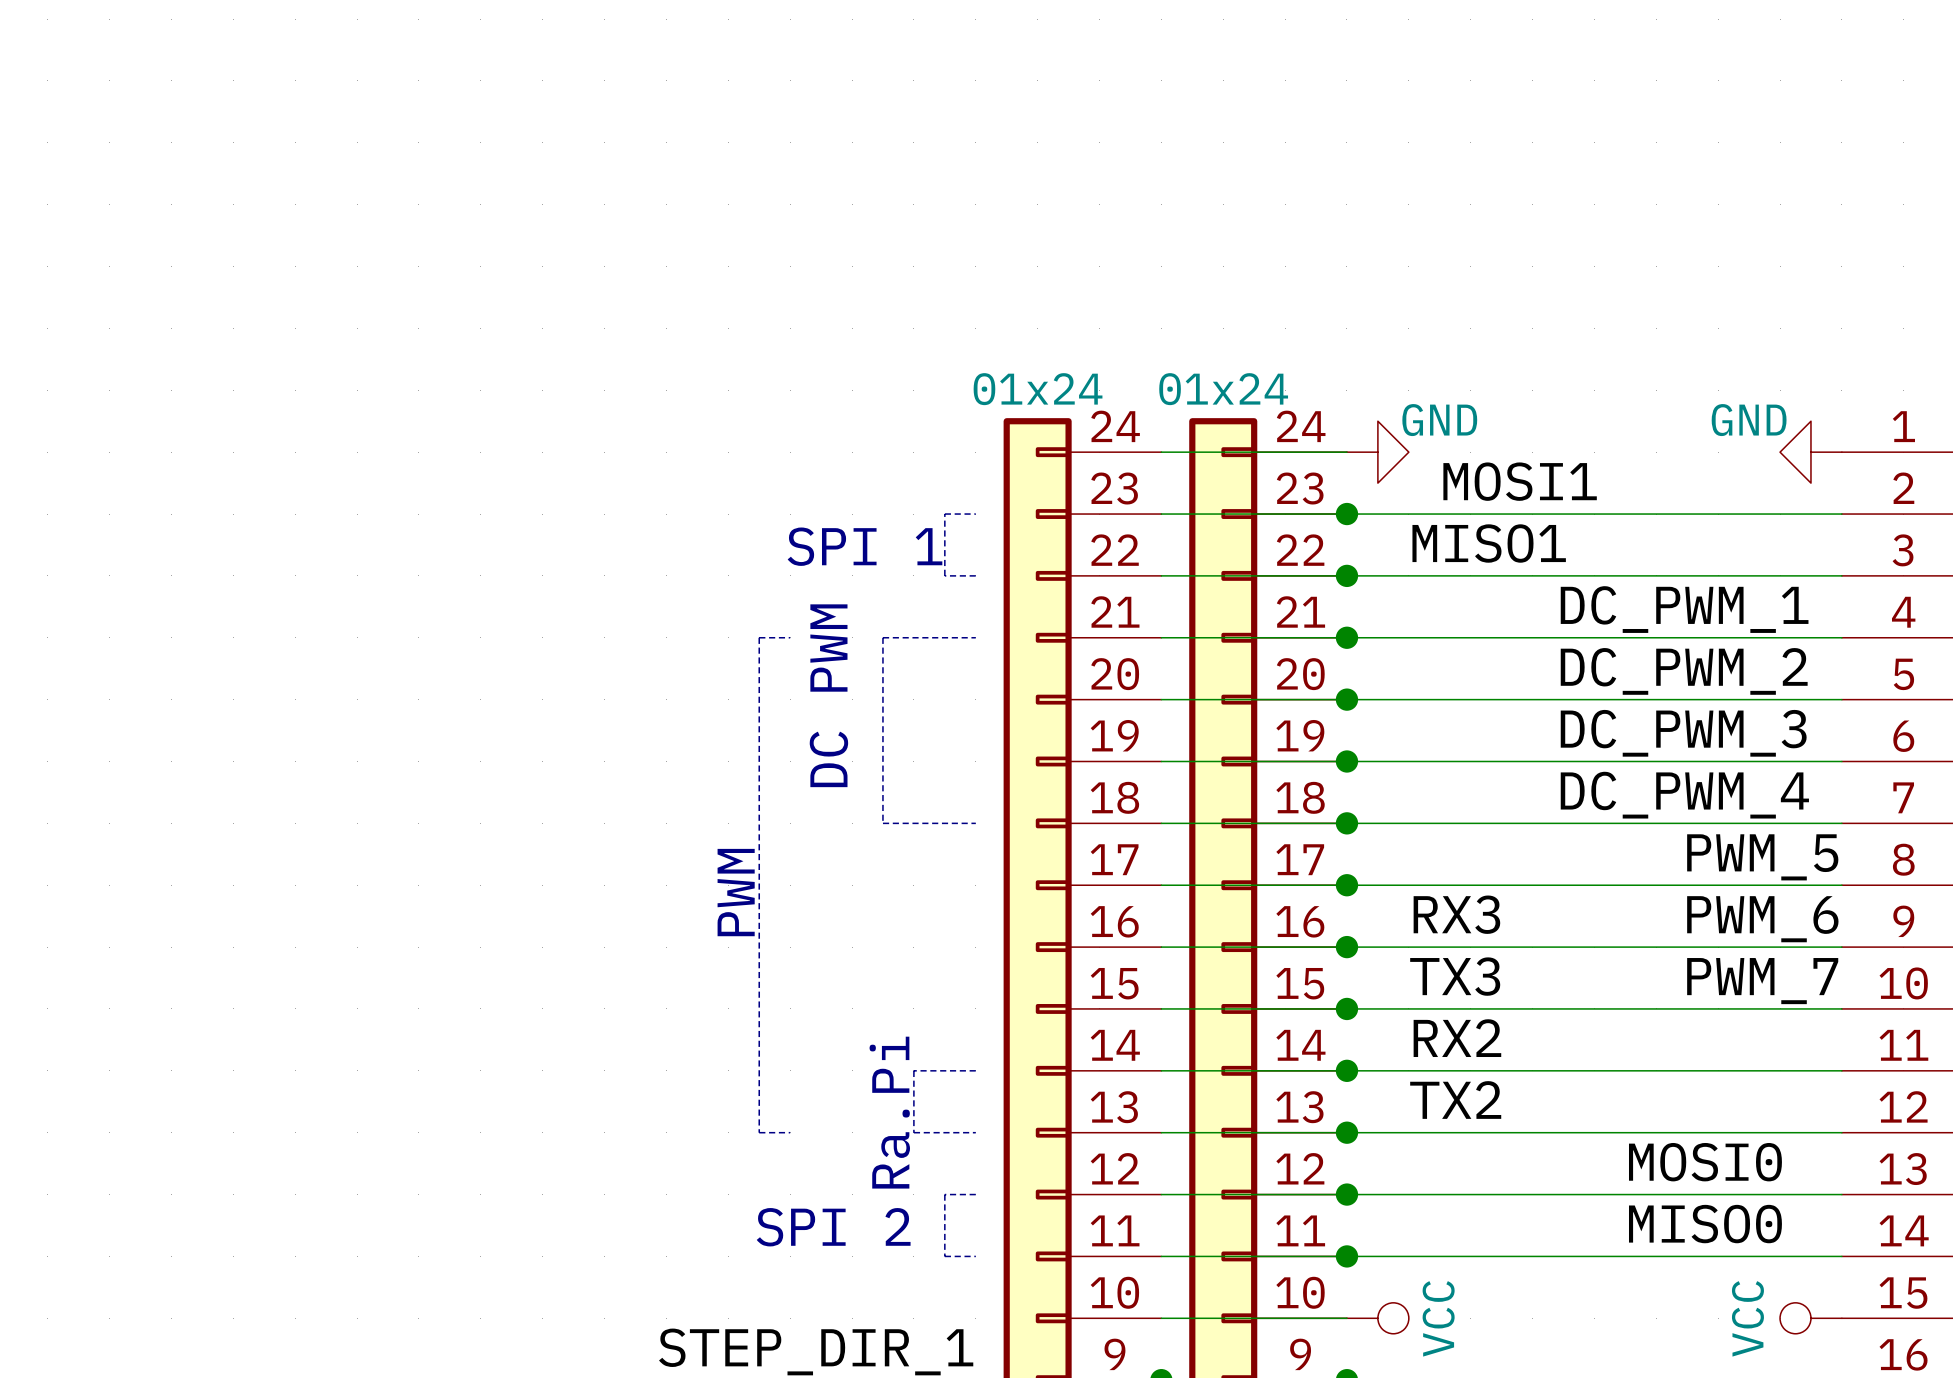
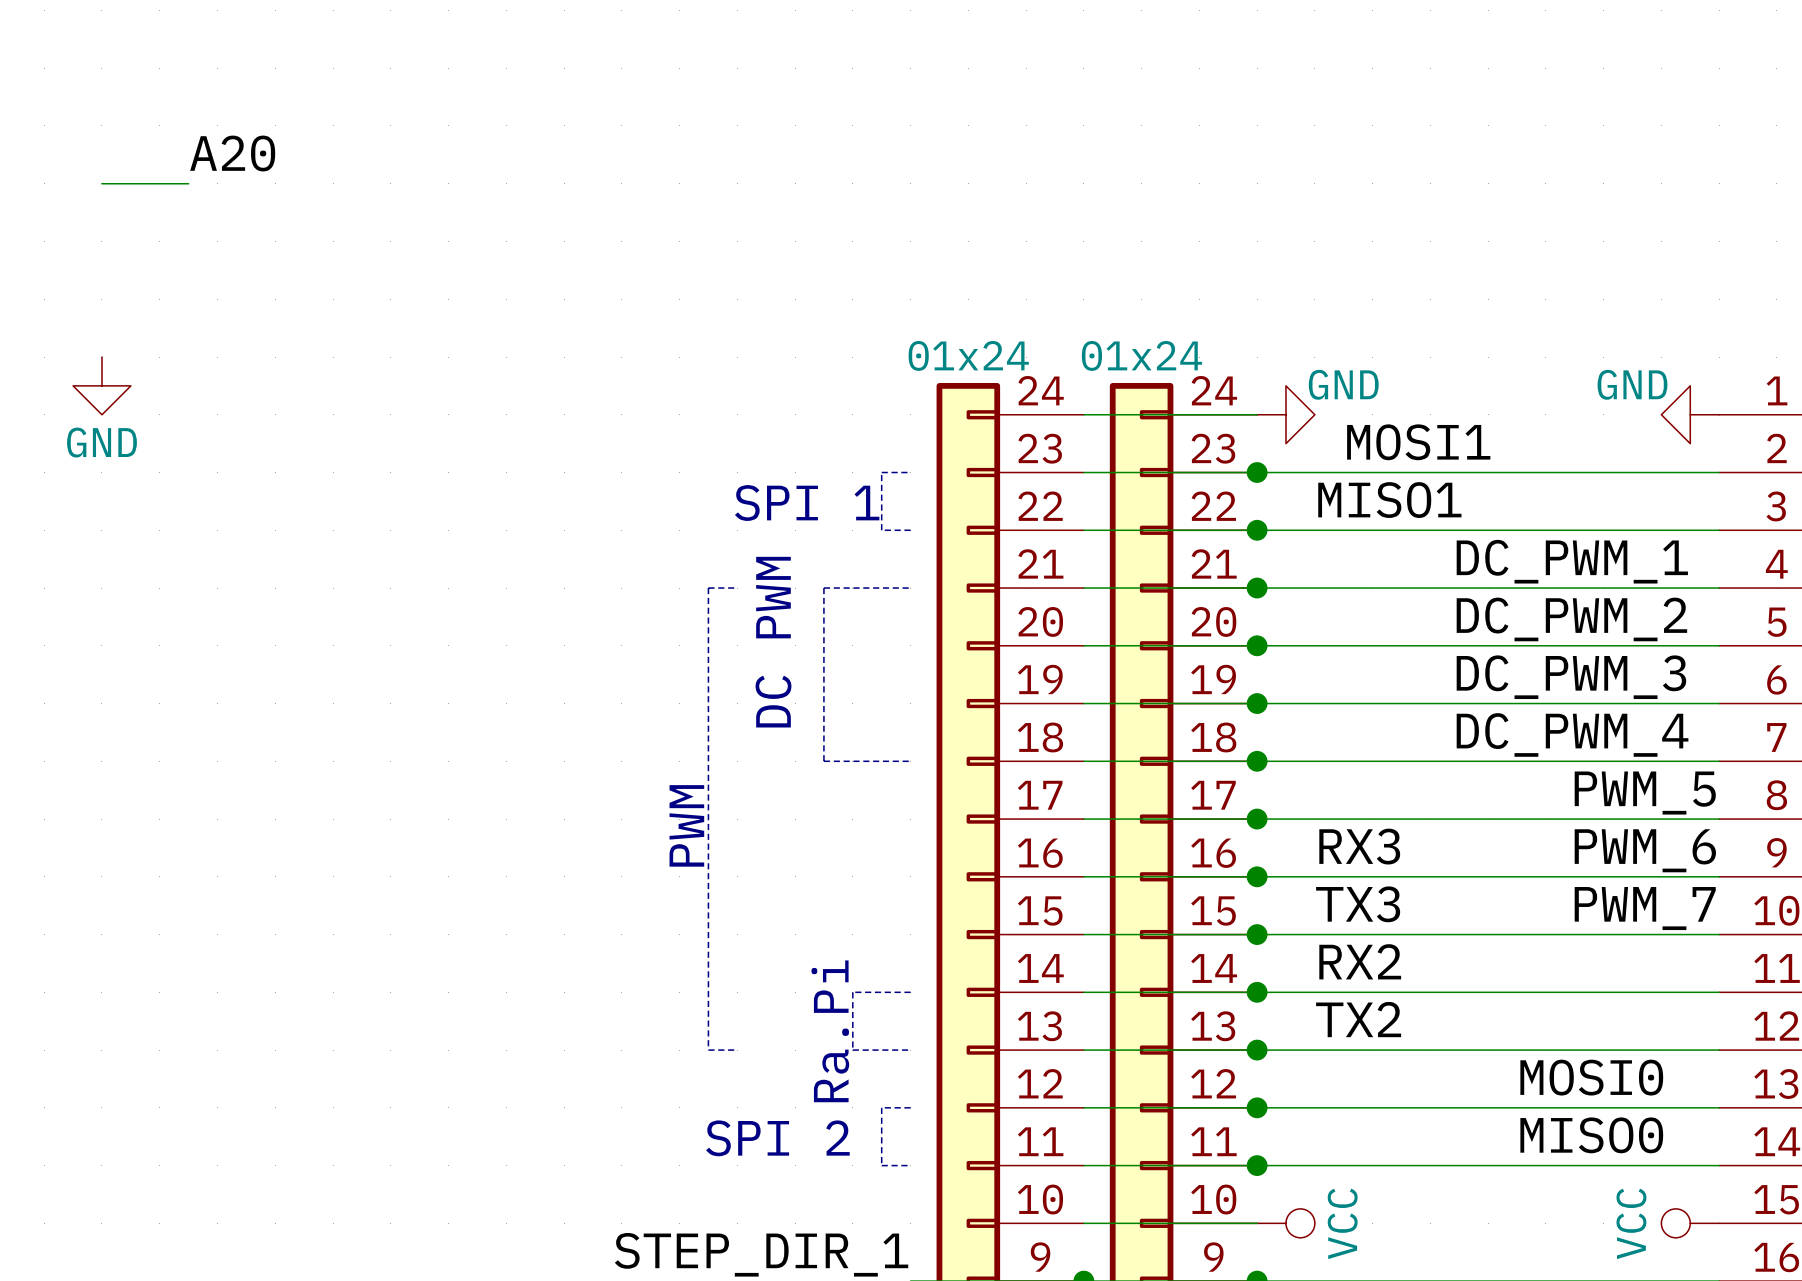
label: none -> A20 (232, 153)
wire: none -> (101, 183) (188, 183)
power symbol: none -> GND (101, 385)

